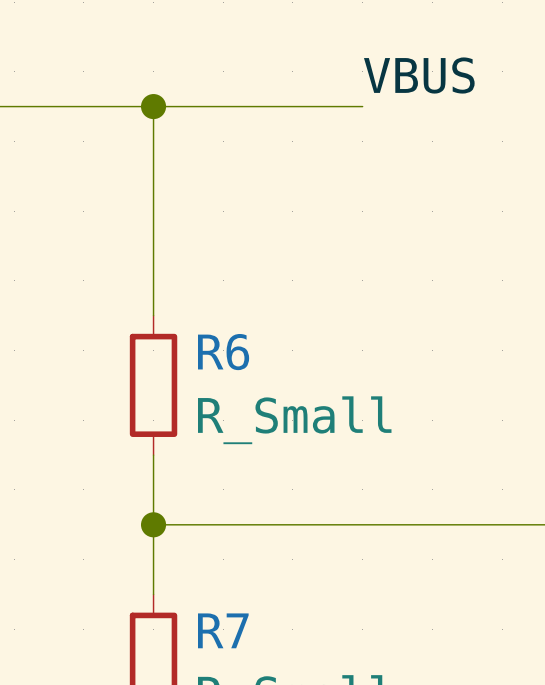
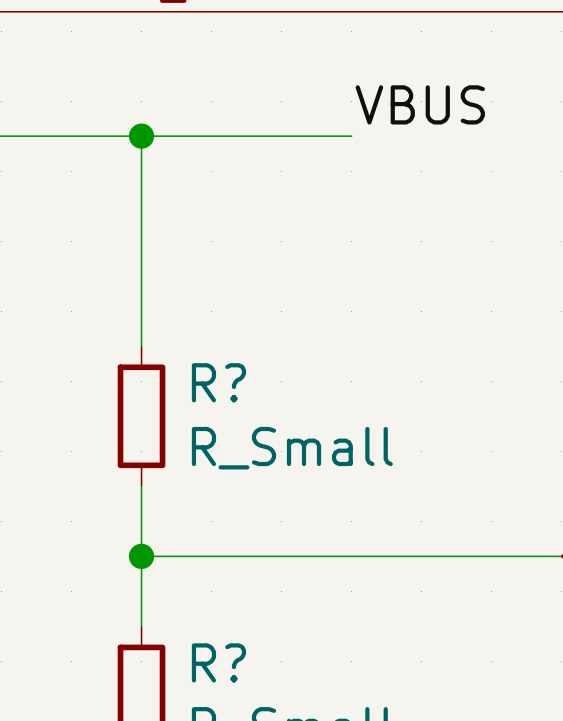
R6 name: R6 (223, 352) -> R? (218, 382)
R7 name: R7 (223, 630) -> R? (218, 662)

